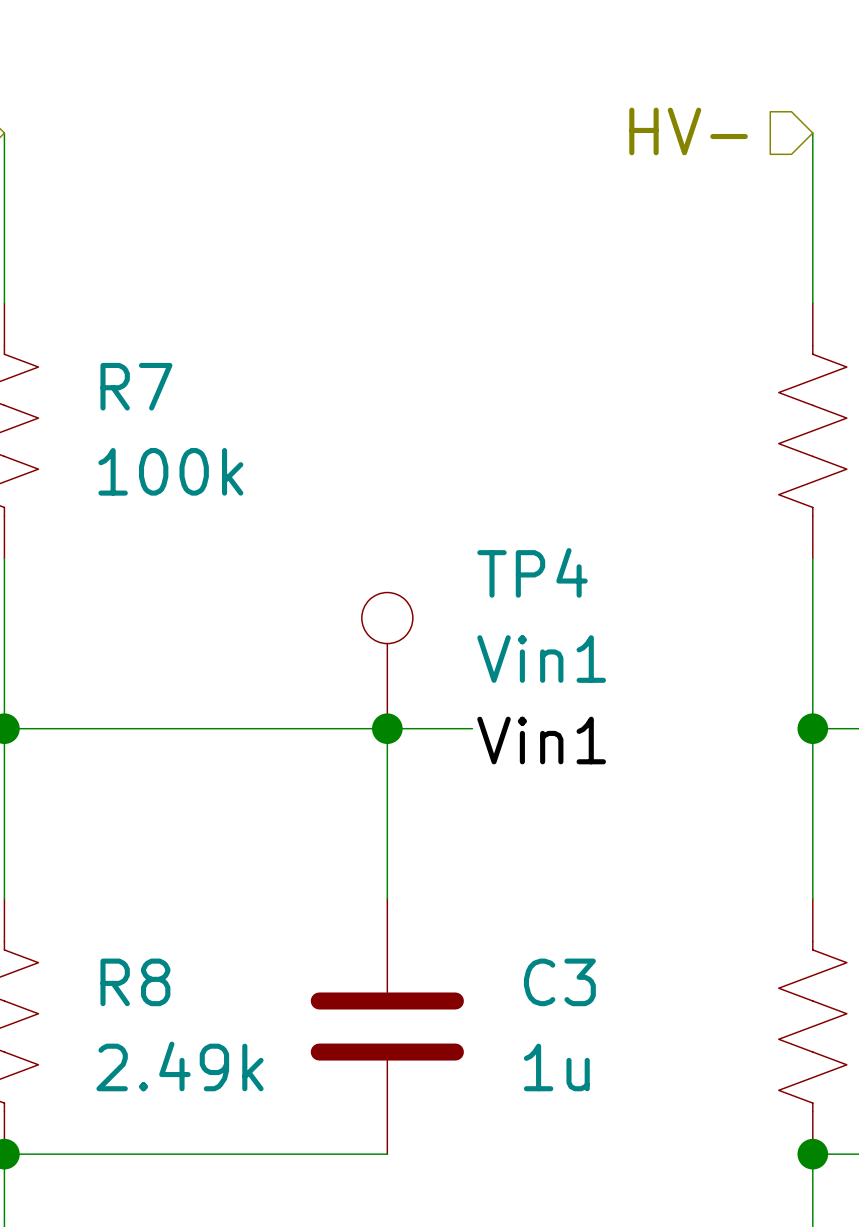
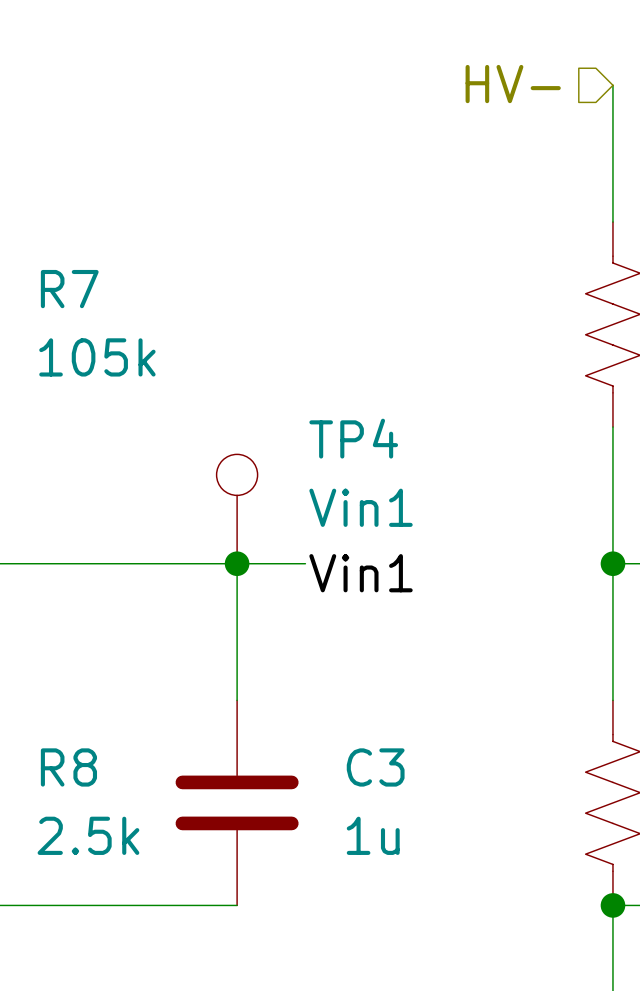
R7 value: 100k (170, 471) -> 105k (97, 357)
TP4 position: (387, 660) -> (237, 509)
wire: (387, 728) (387, 898) -> (237, 563) (237, 700)
junction position: (387, 728) -> (237, 563)
wire: (429, 728) (472, 728) -> none
label position: Vin1 (541, 740) -> Vin1 (361, 573)
C3 position: (387, 1026) -> (237, 802)
R8 value: 2.49k (179, 1066) -> 2.5k (88, 835)
wire: (344, 1154) (387, 1154) -> none

